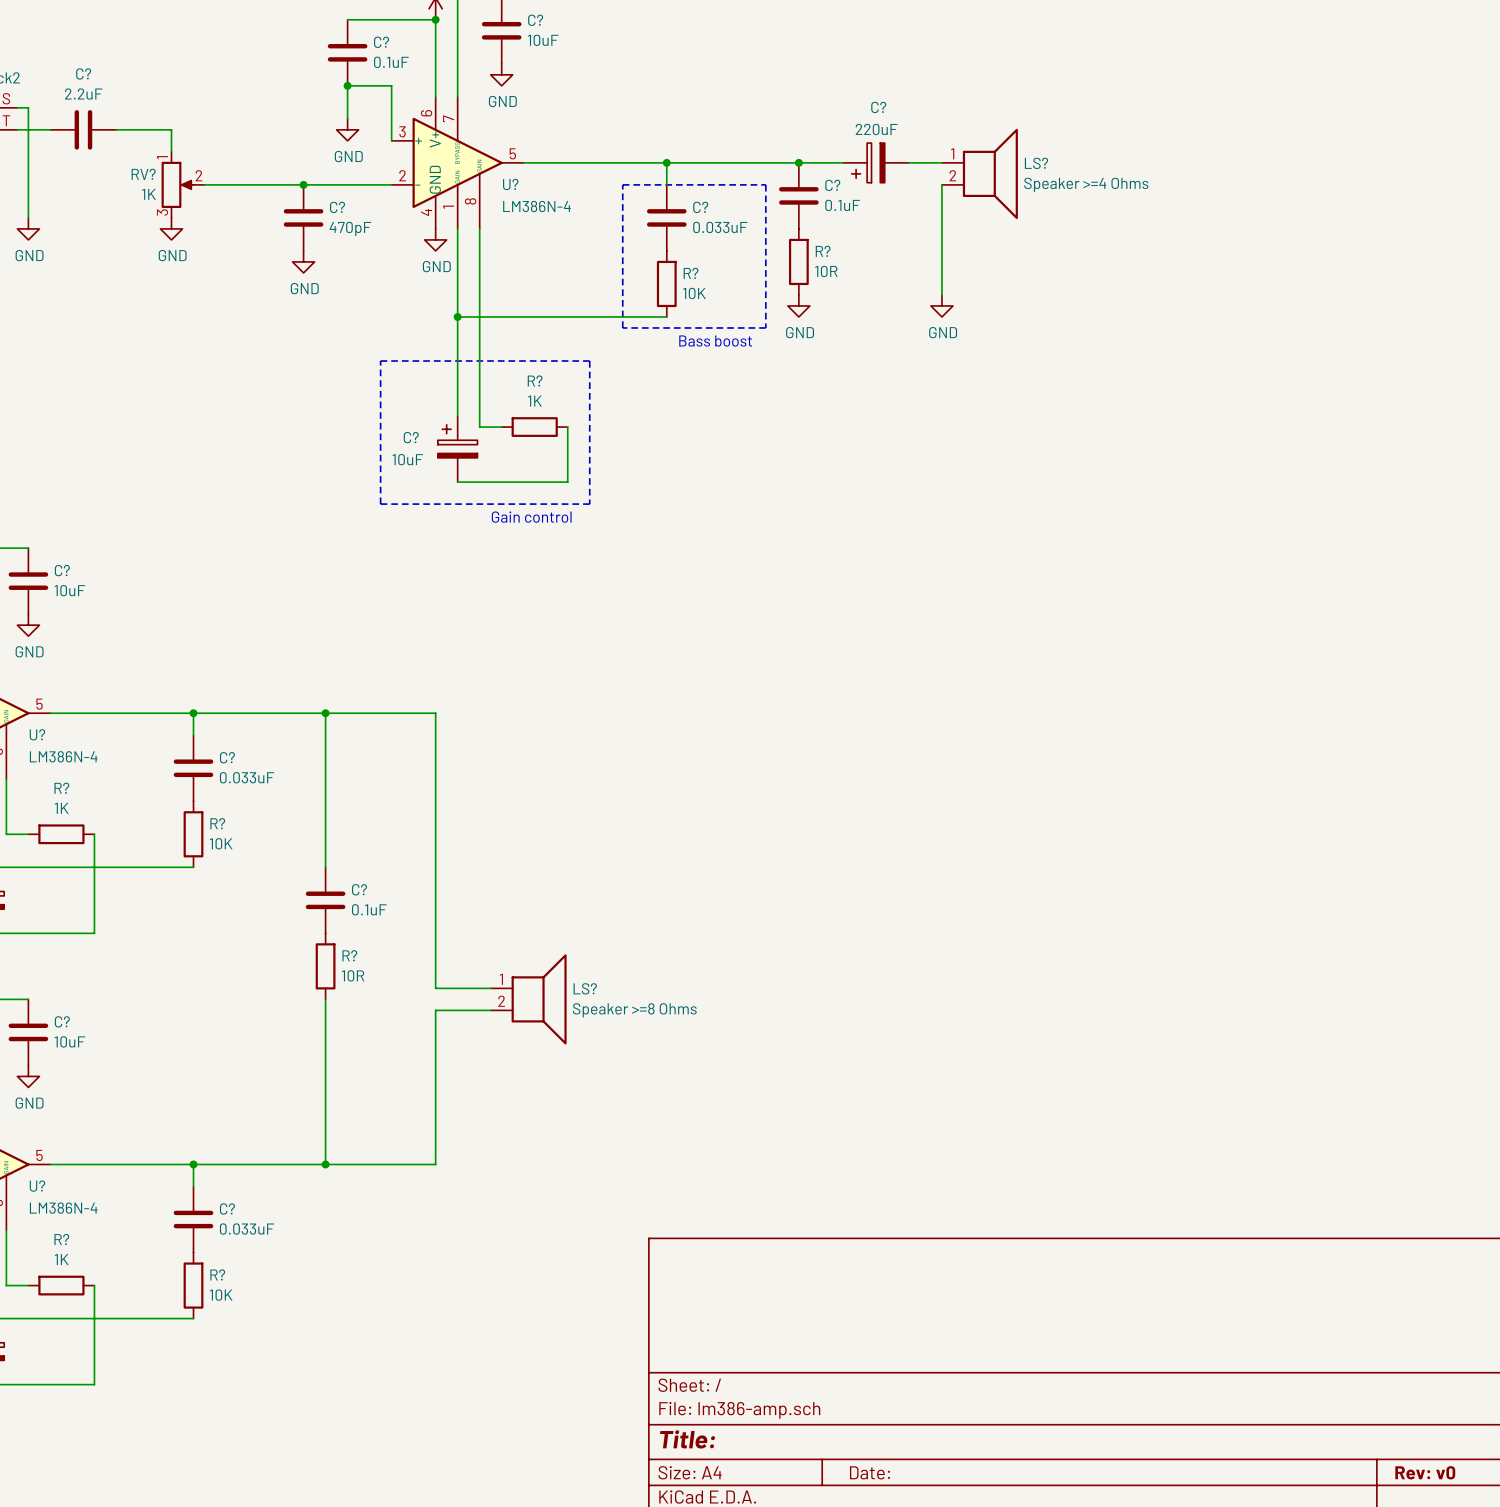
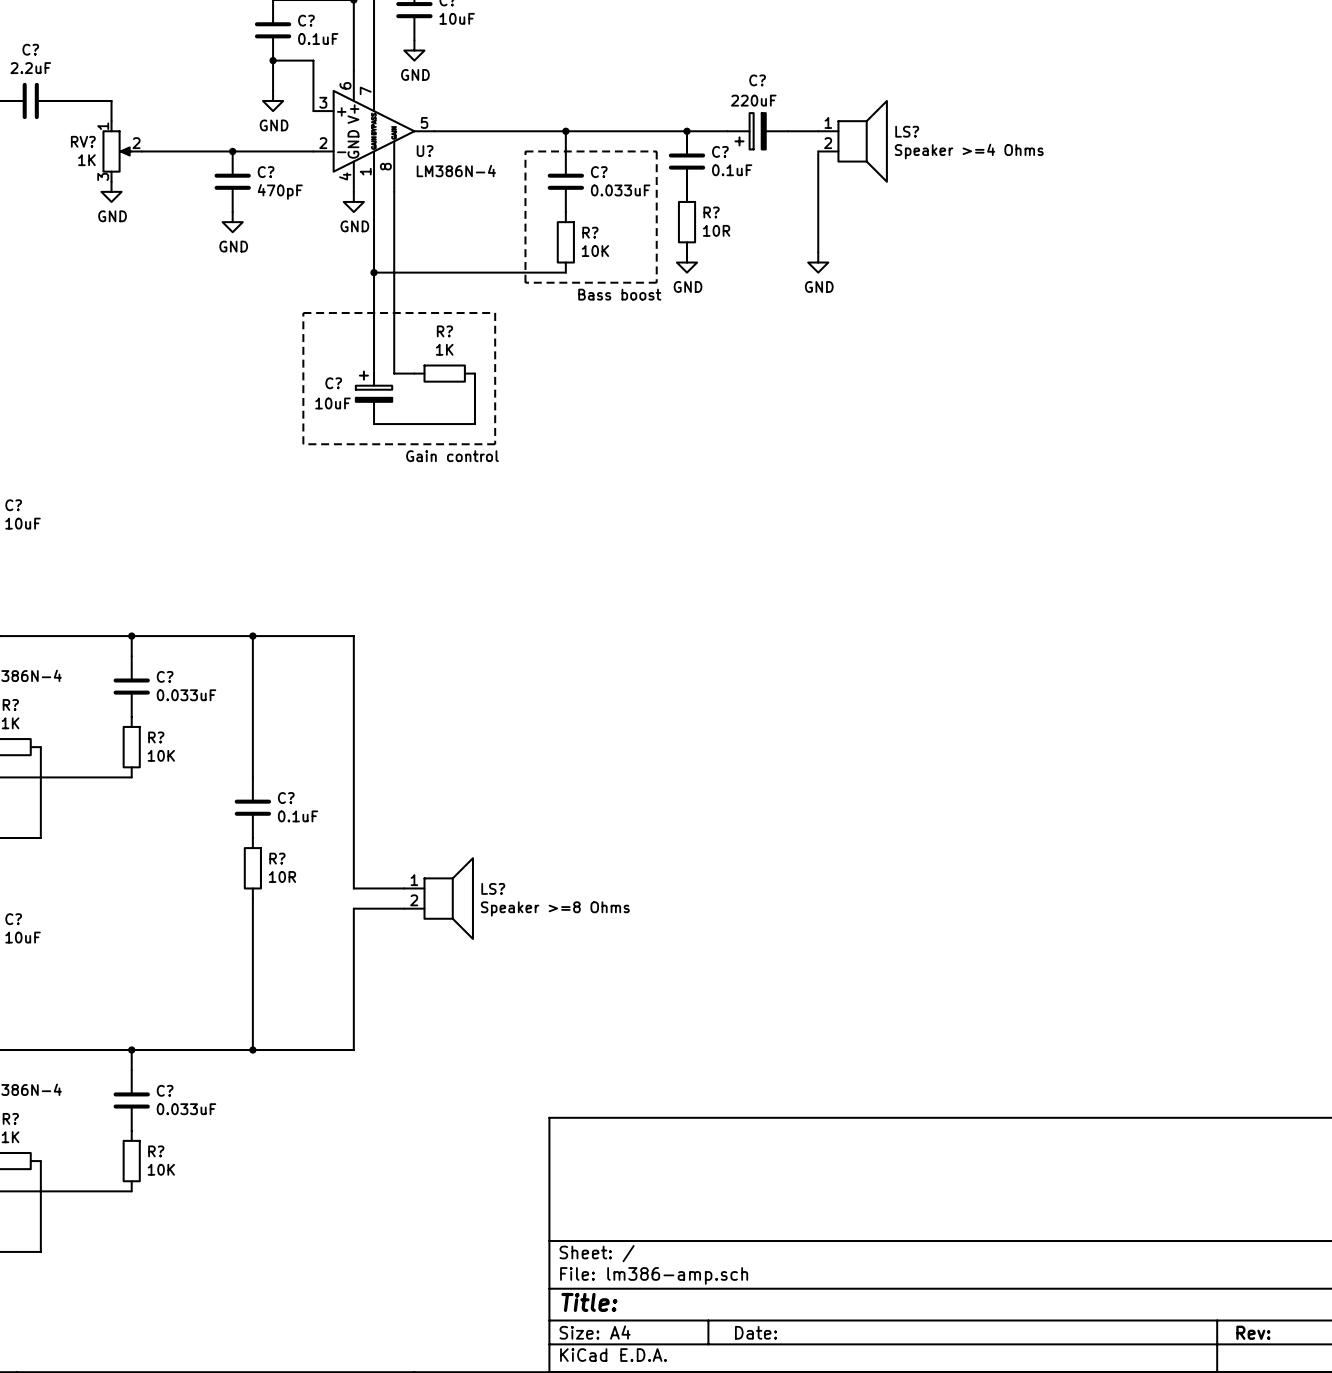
title block: Rev: v0 (1425, 1472) -> Rev: (1253, 1332)

